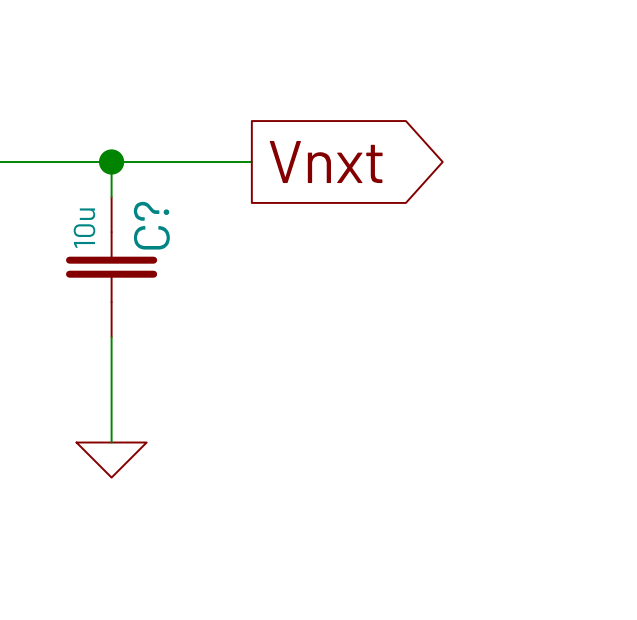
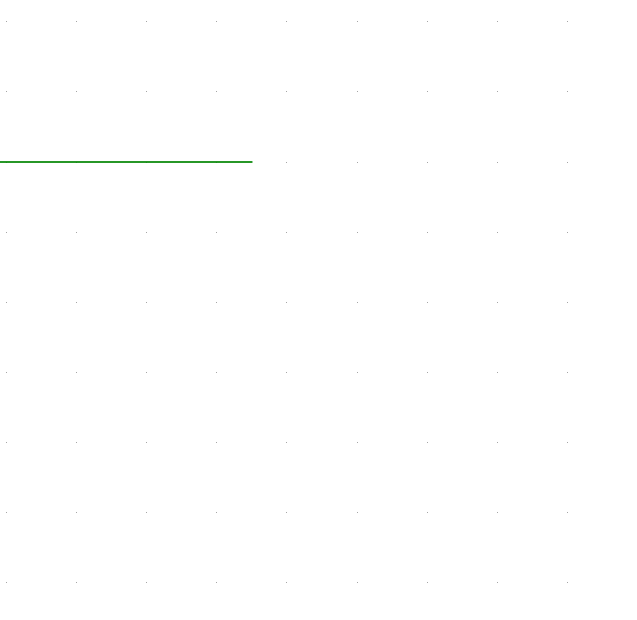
wire: (111, 162) (111, 197) -> none
junction: (111, 162) -> none
global label: Vnxt (326, 162) -> none
C?: 10u (111, 267) -> none
wire: (111, 337) (111, 442) -> none
power symbol: (111, 460) -> none

